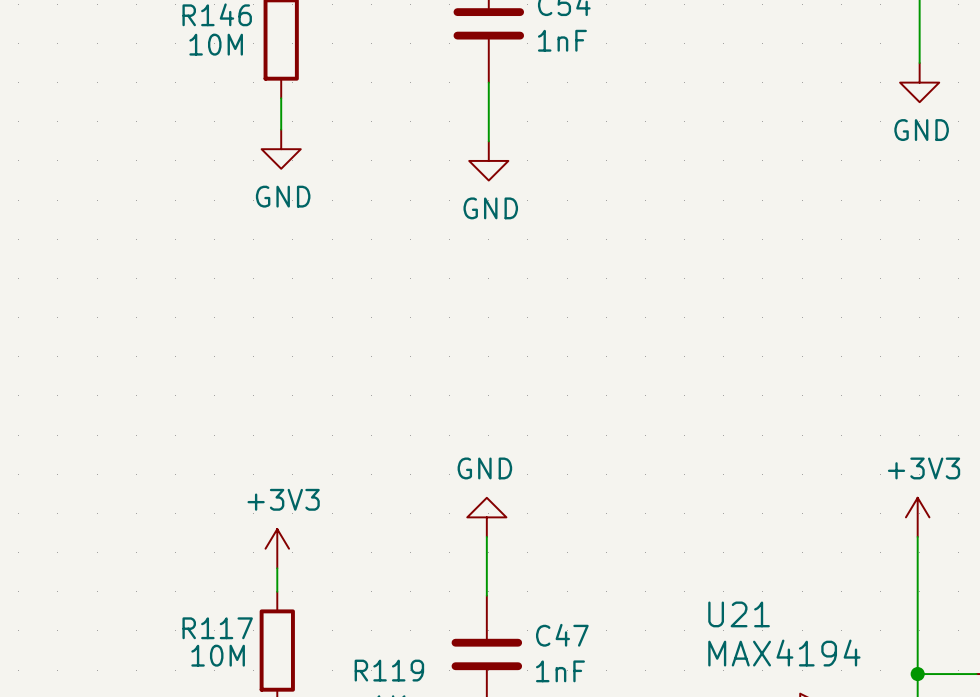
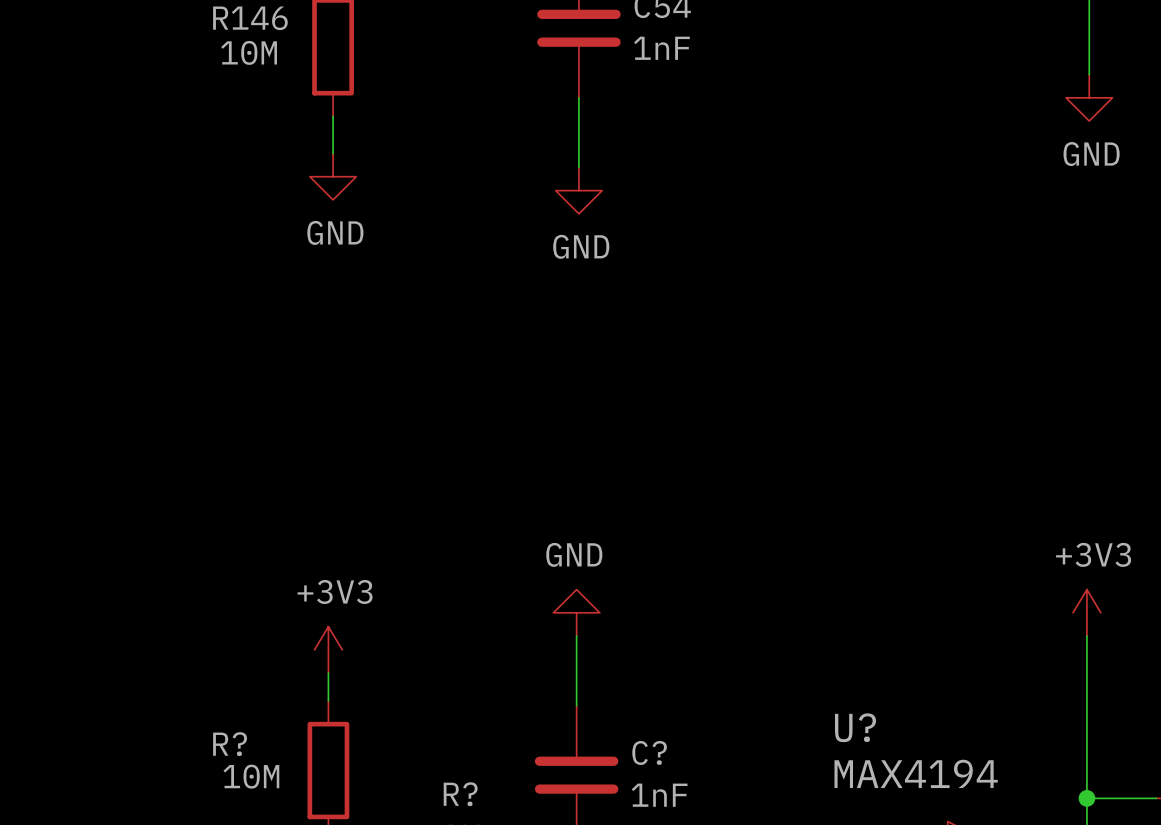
U21 name: U21 (739, 614) -> U? (855, 727)
R117 name: R117 (217, 628) -> R? (230, 744)
C47 name: C47 (562, 635) -> C? (649, 752)
R119 name: R119 (389, 670) -> R? (460, 794)

